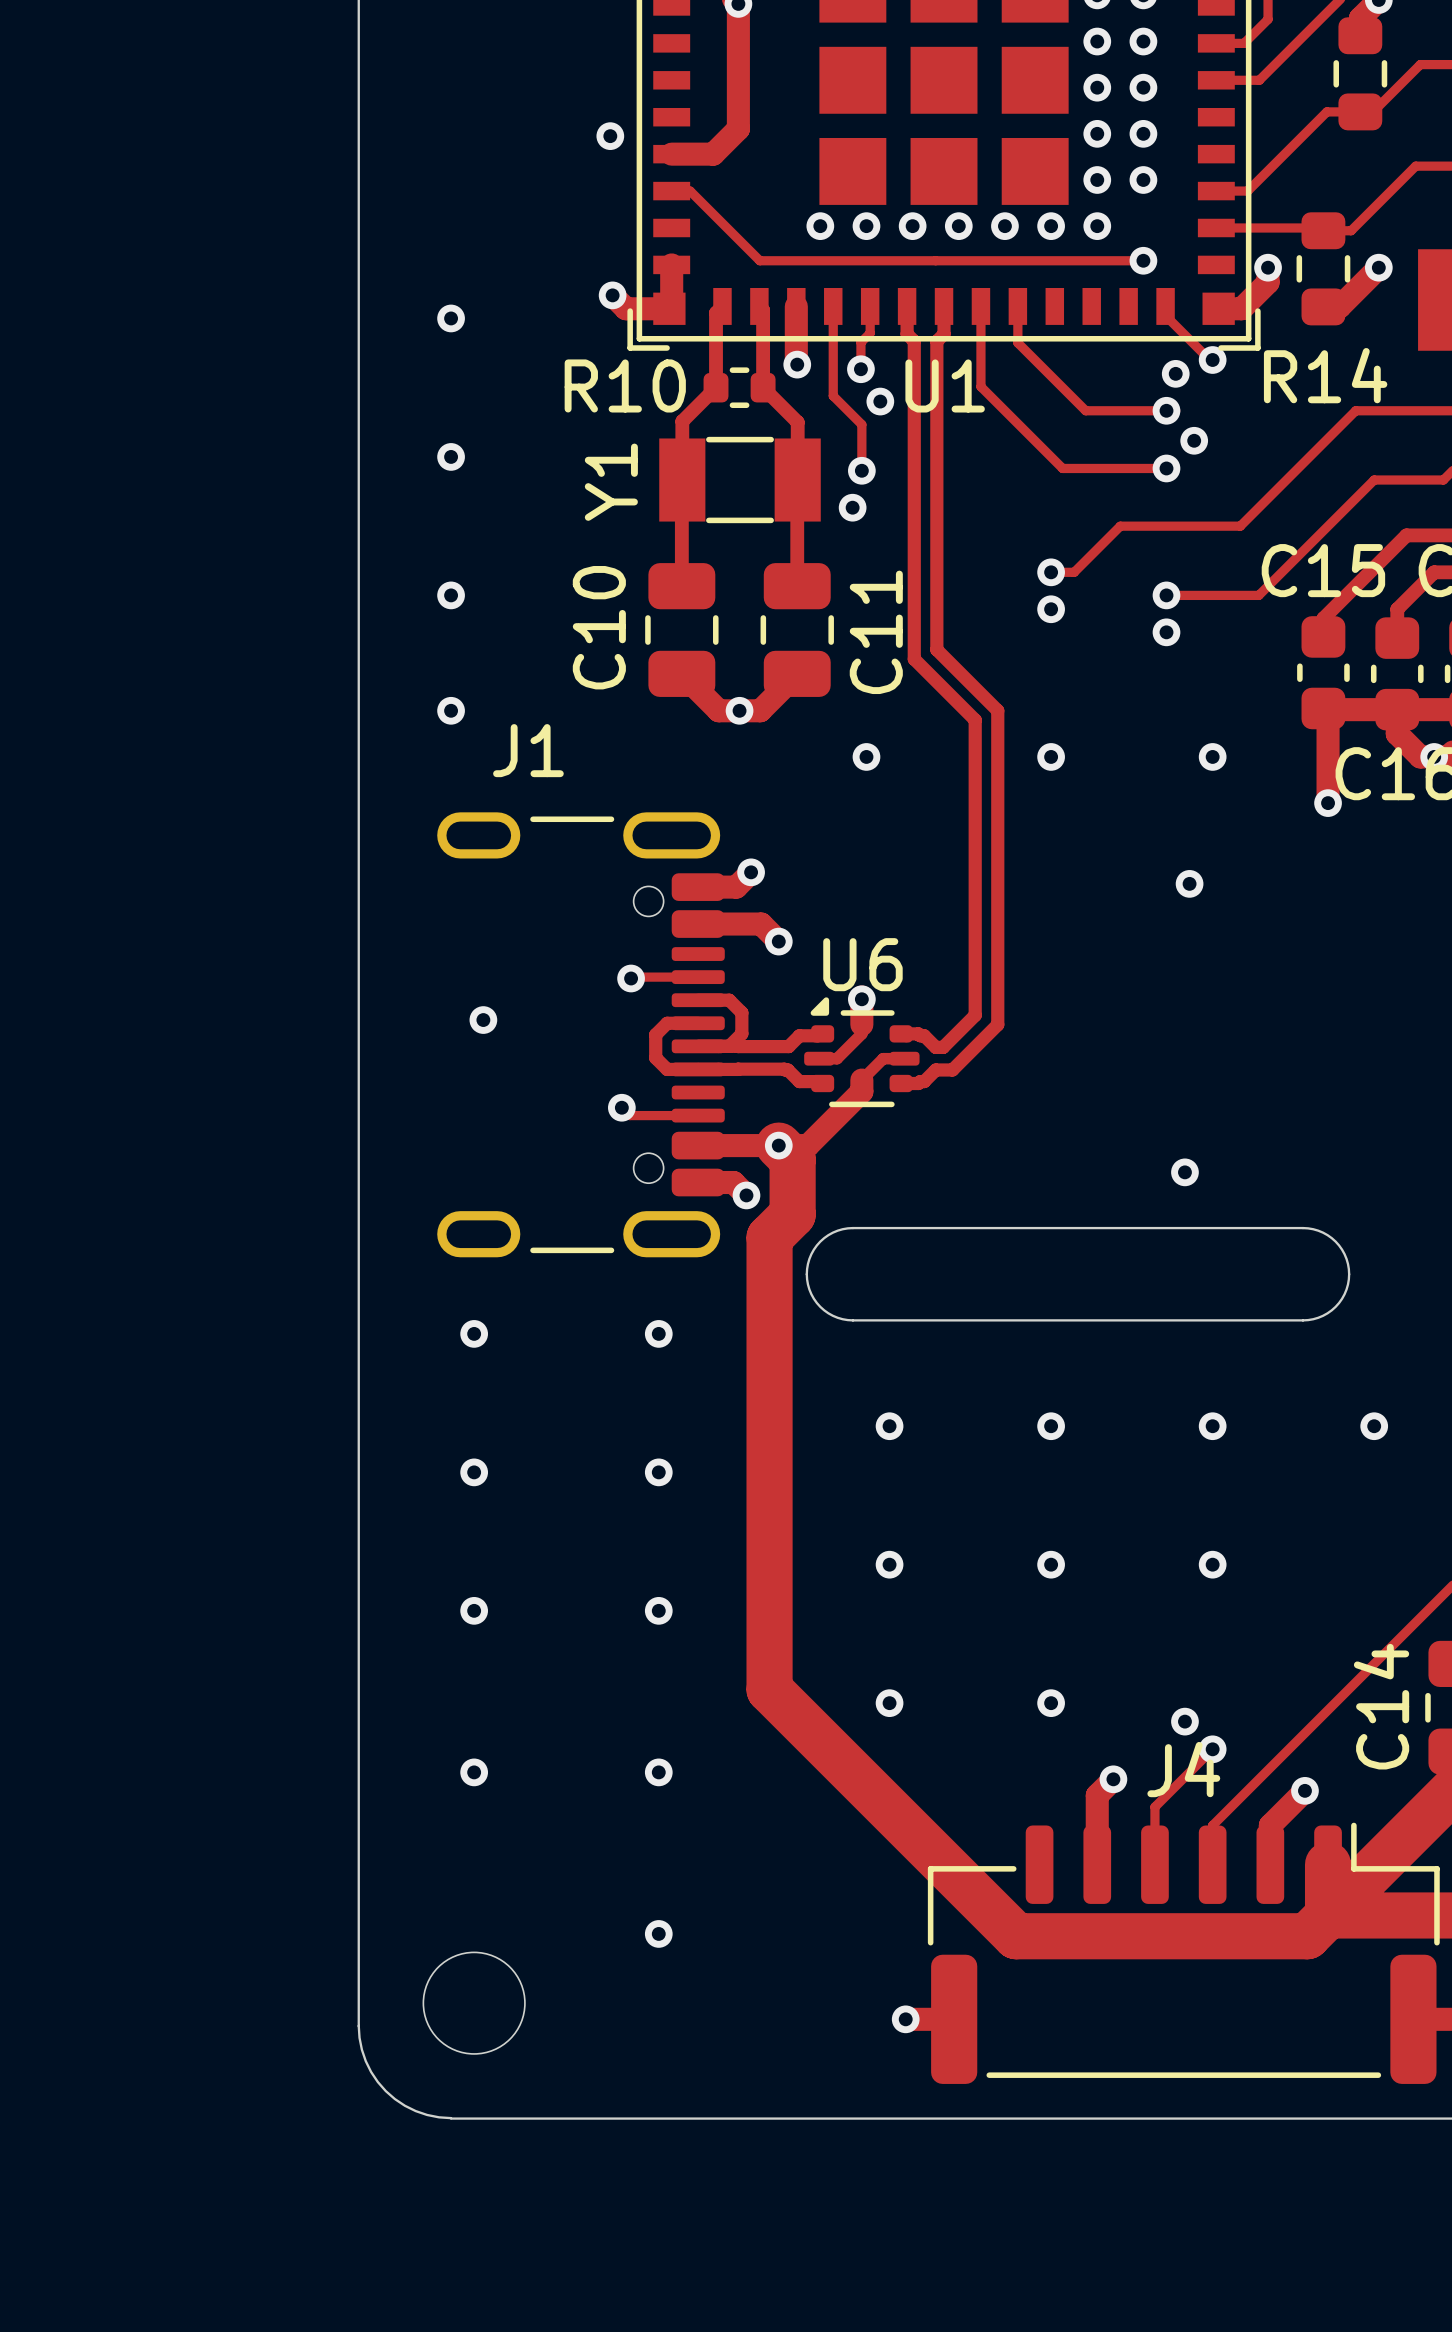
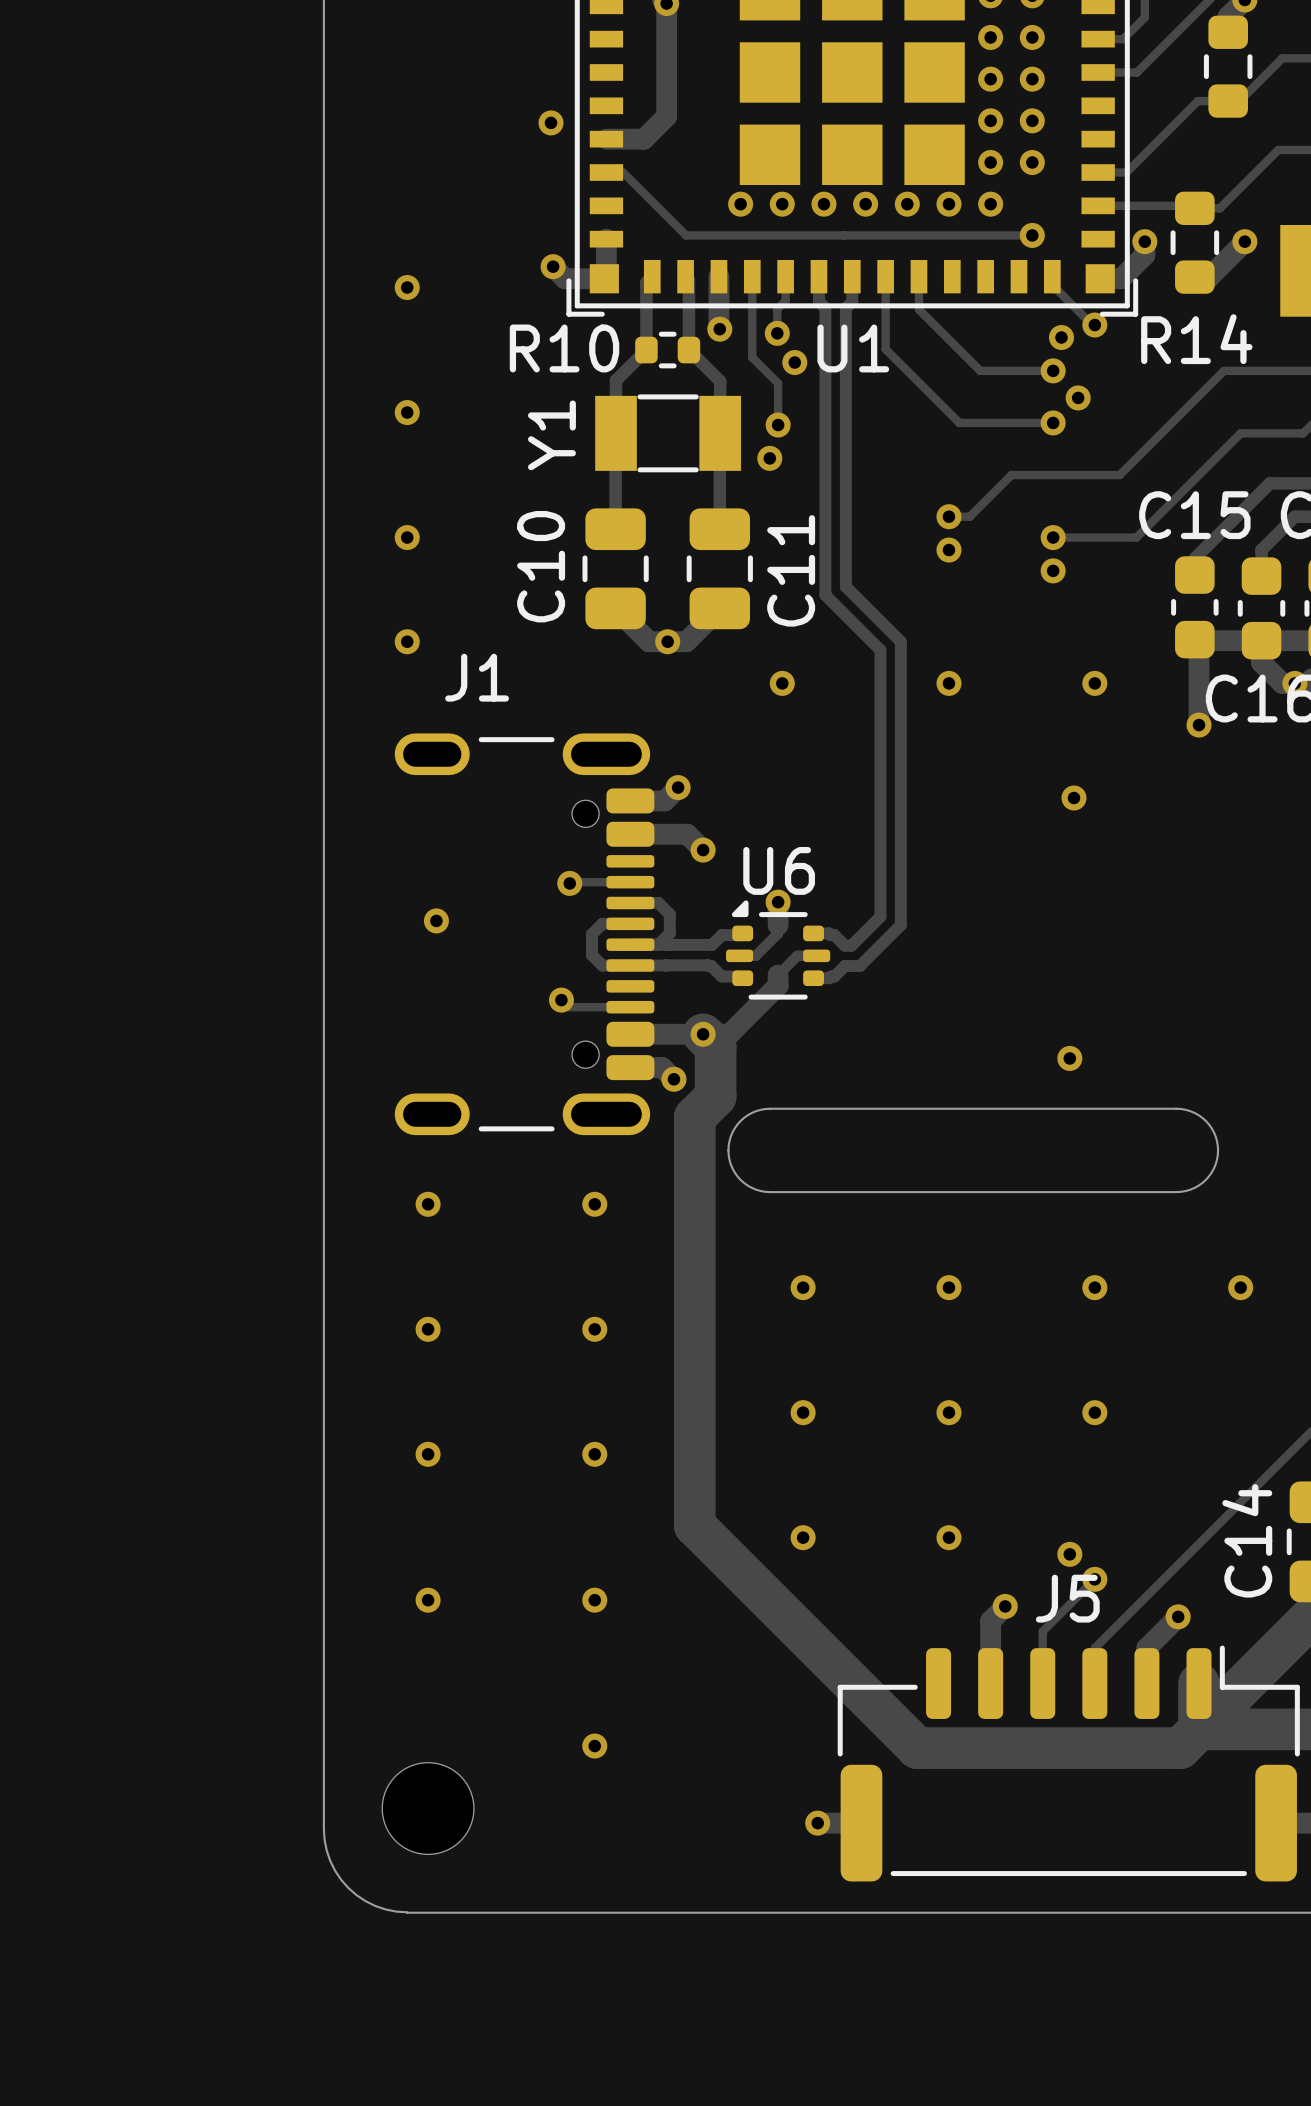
J4 name: J4 (1183, 1769) -> J5 (1067, 1598)

